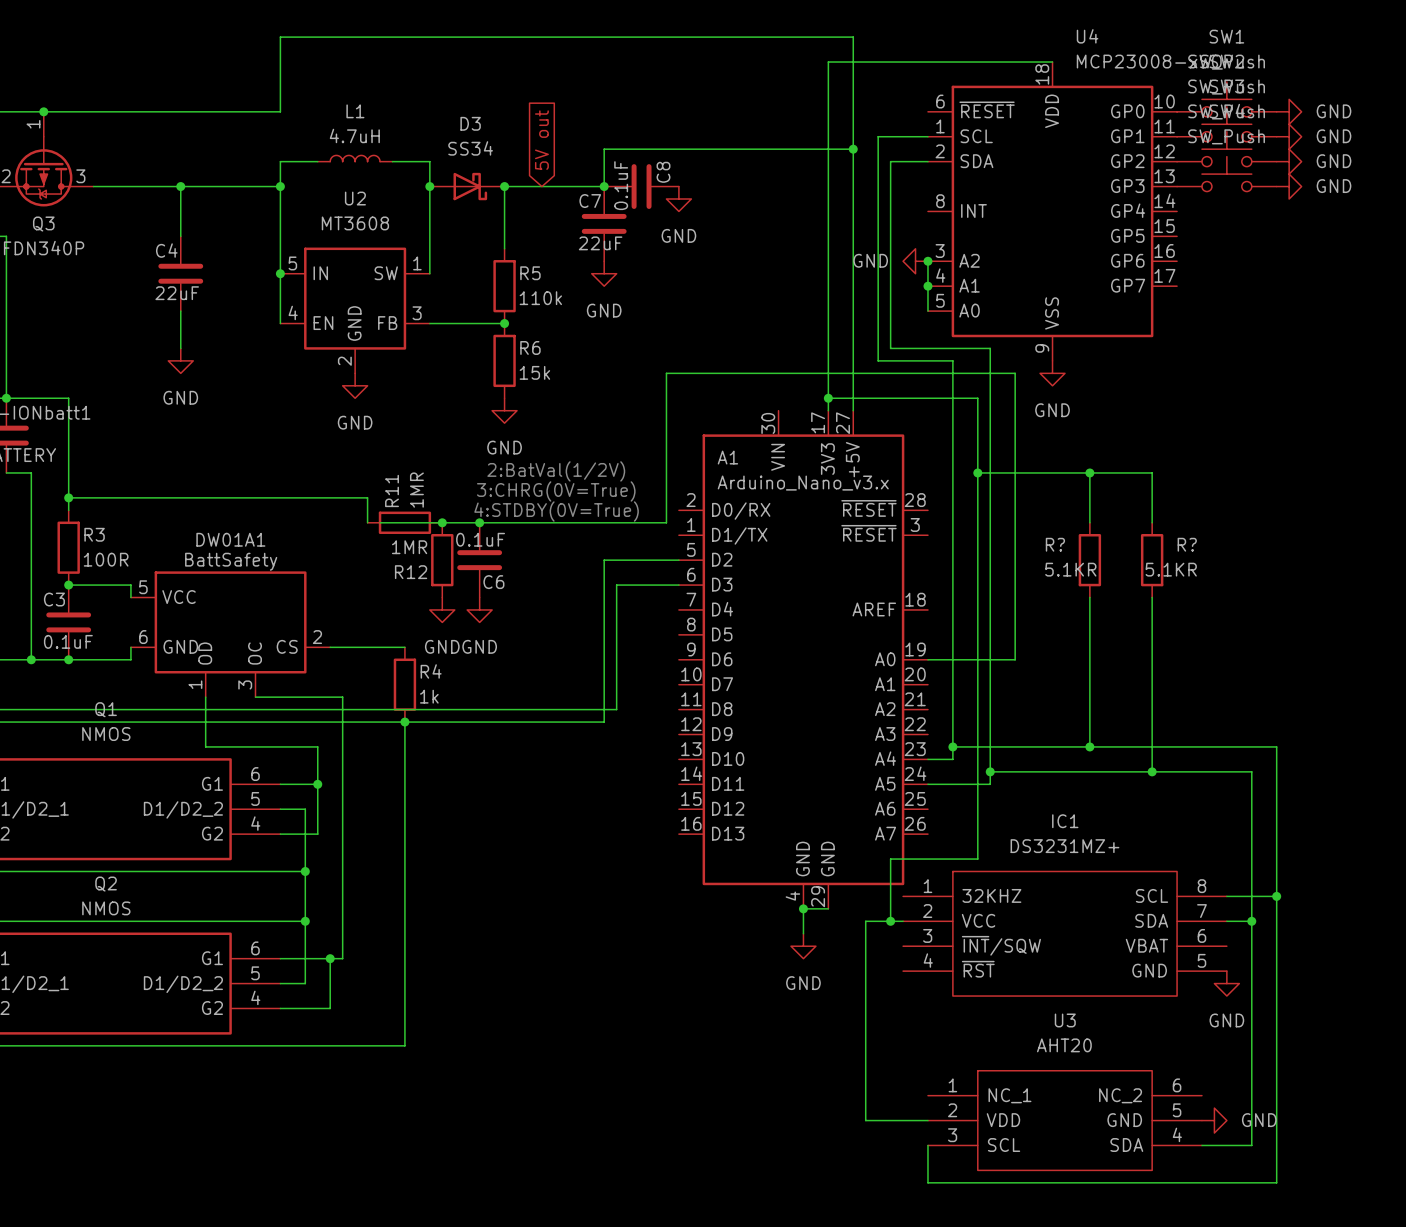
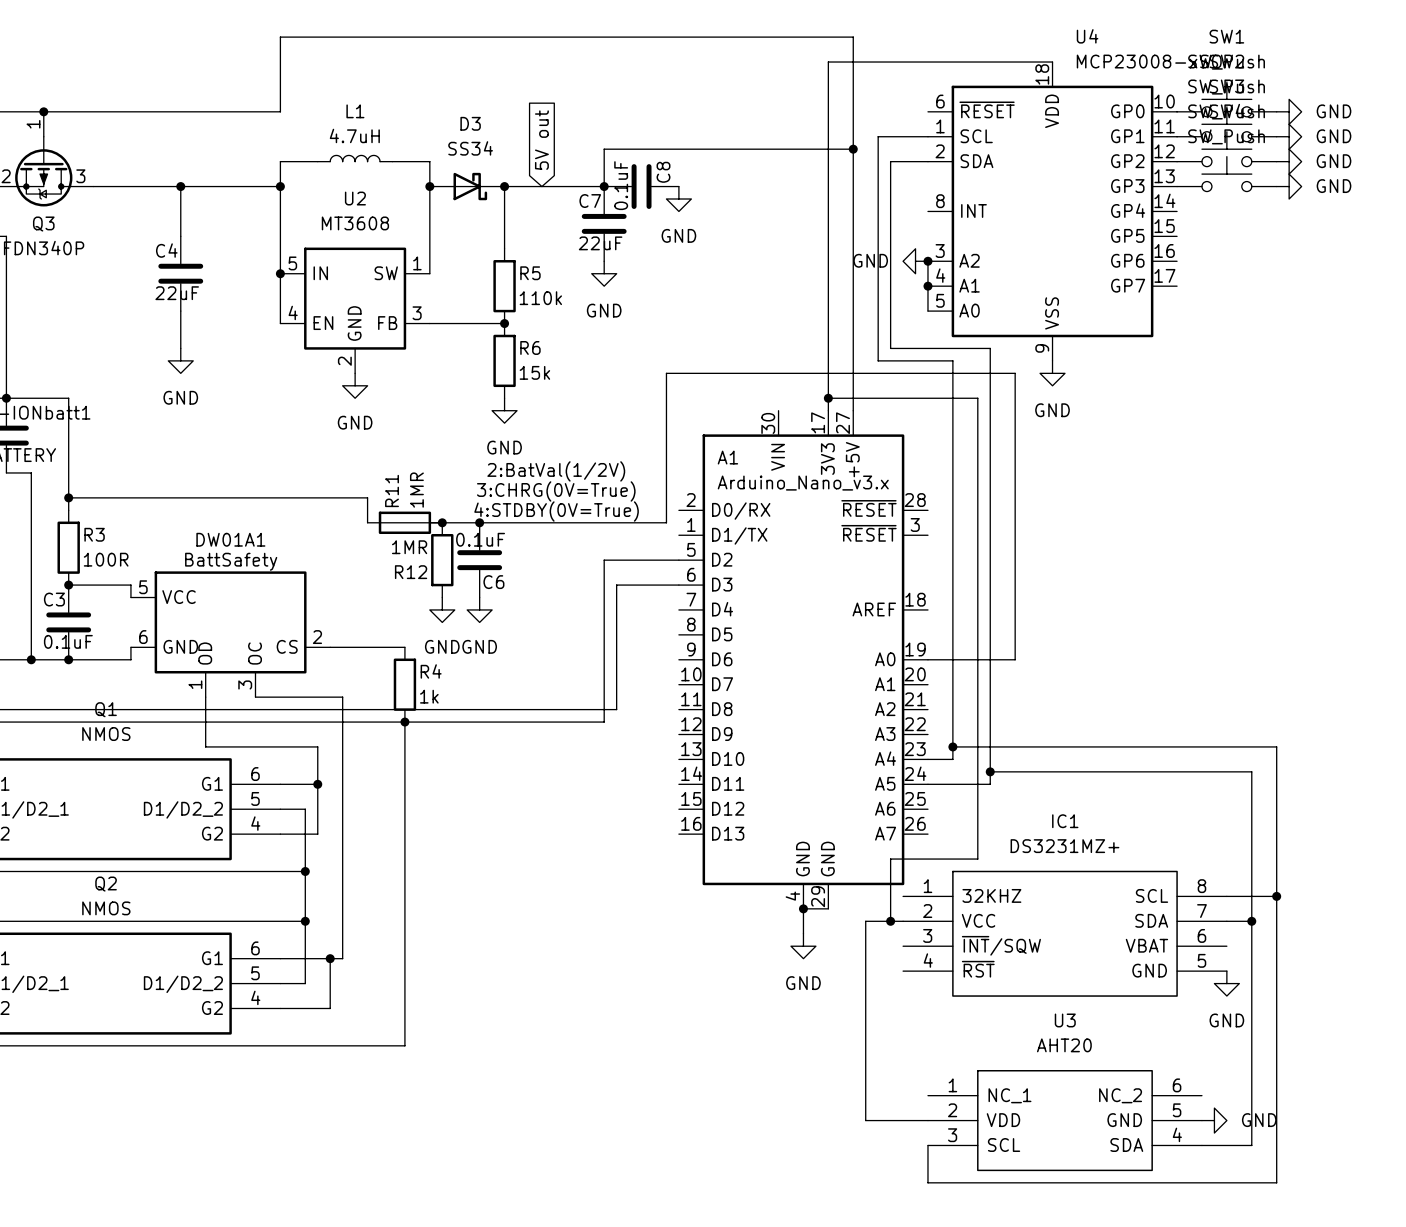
wire: (977, 472) (1152, 472) (1152, 522) -> none
junction: (977, 472) -> none
wire: (1089, 472) (1089, 522) -> none
junction: (1089, 472) -> none
R?: 5.1KR (1089, 560) -> none
R?: 5.1KR (1152, 560) -> none
wire: (1089, 597) (1089, 746) -> none
wire: (1152, 597) (1152, 771) -> none
junction: (1089, 746) -> none
junction: (1152, 771) -> none

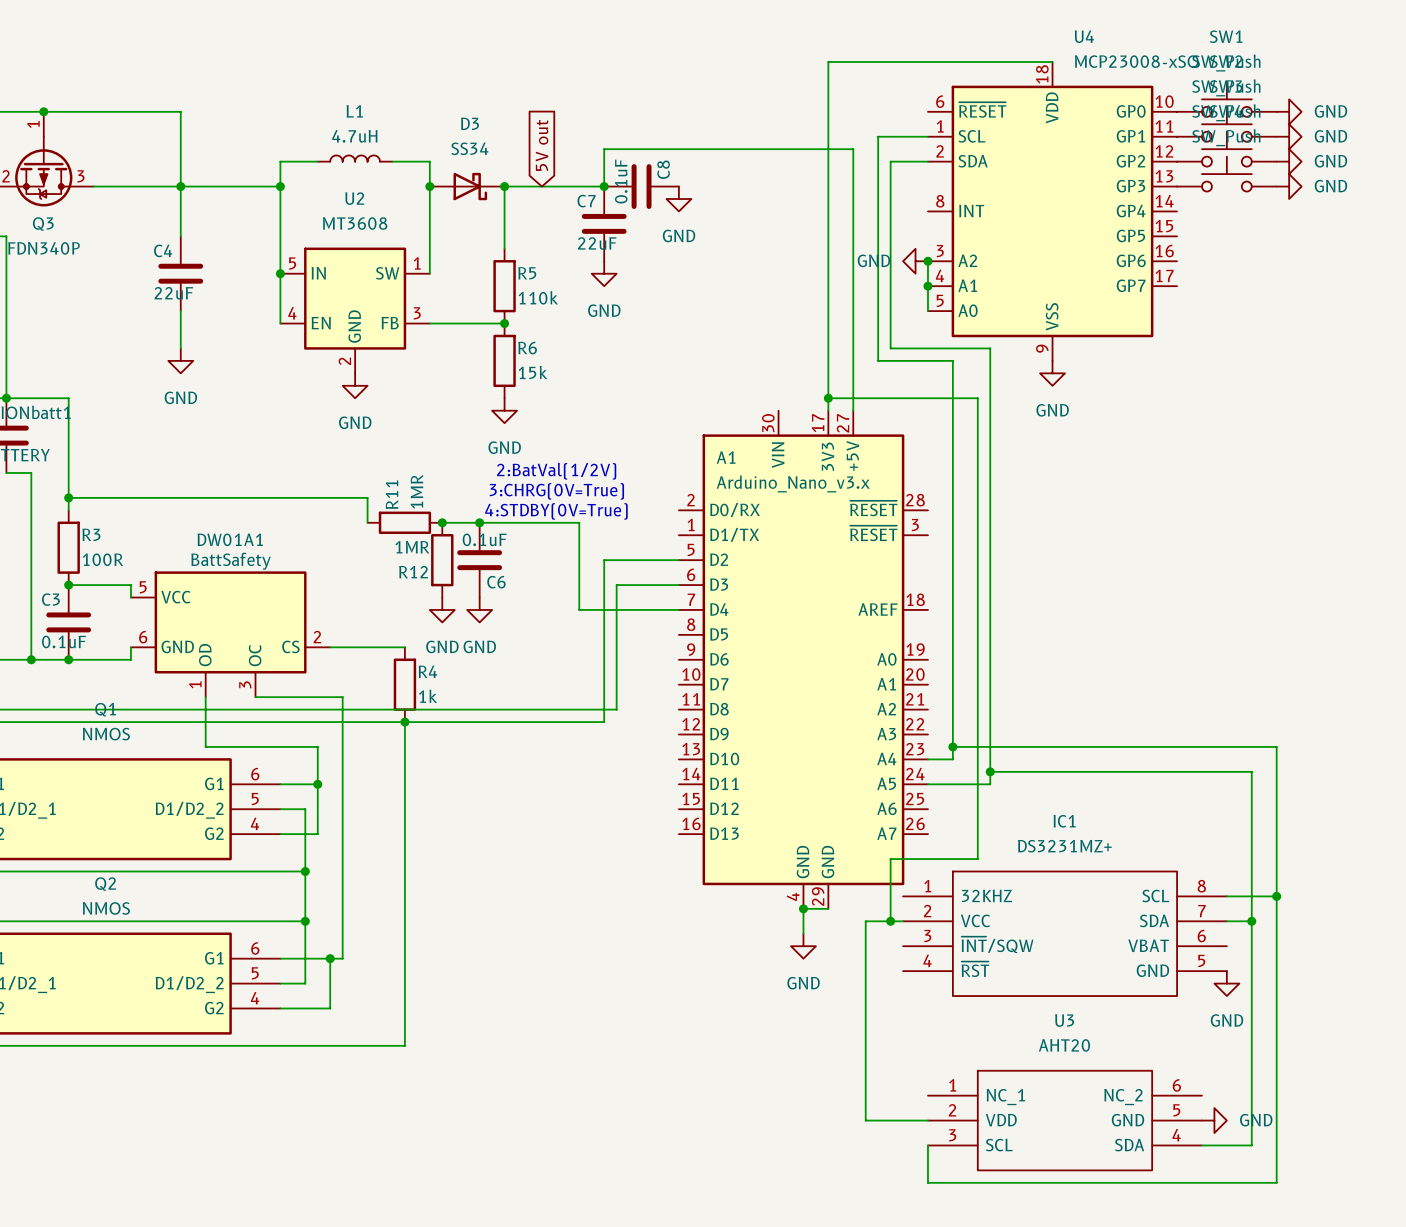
wire: (180, 111) (280, 111) (280, 37) (853, 37) (853, 149) -> (180, 111) (180, 186)
junction: (853, 149) -> none
wire: (380, 522) (442, 522) -> none
wire: (579, 522) (666, 522) (666, 373) (1015, 373) (1015, 659) (927, 659) -> (579, 522) (579, 609) (678, 609)

